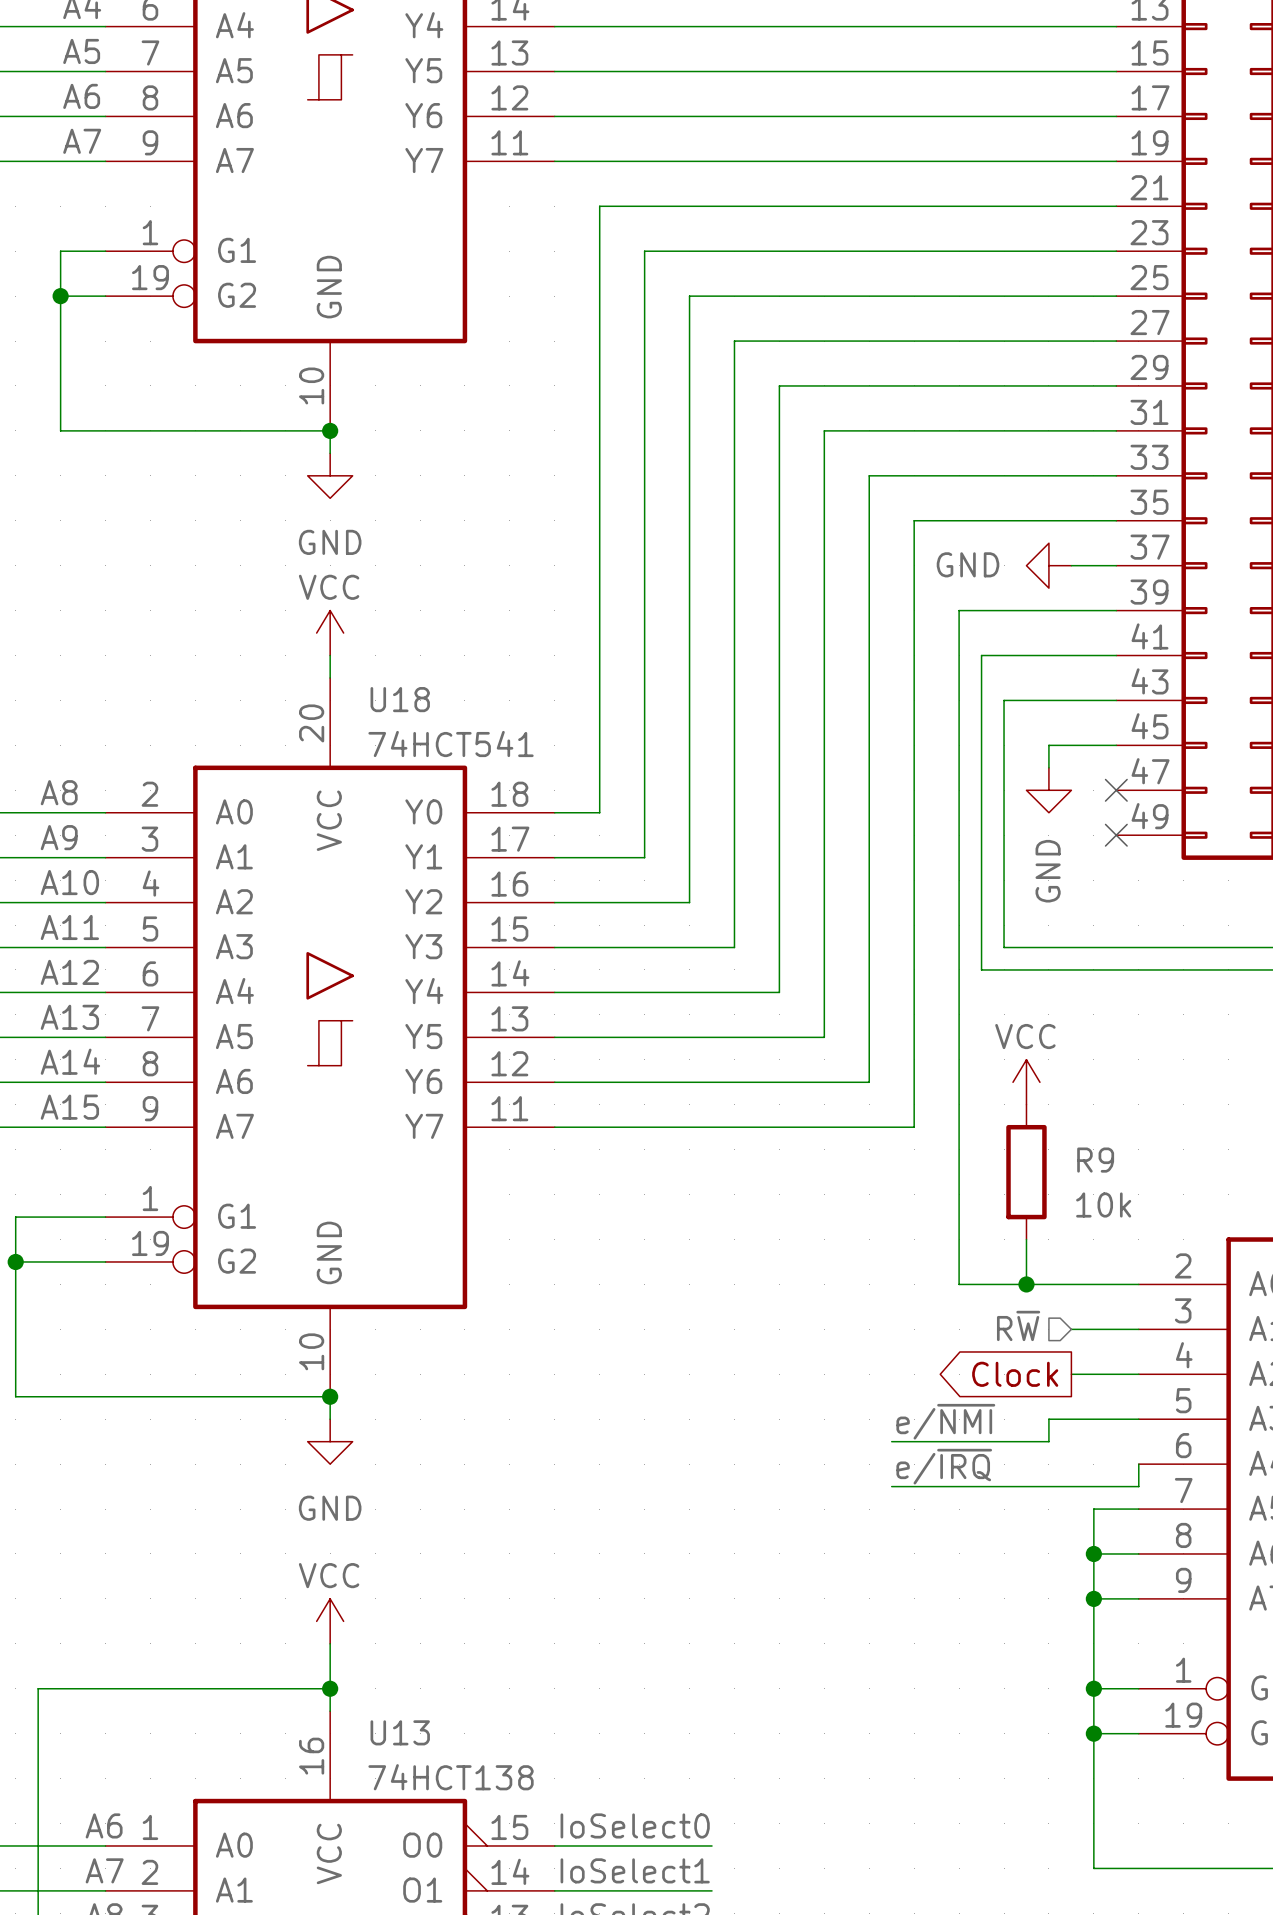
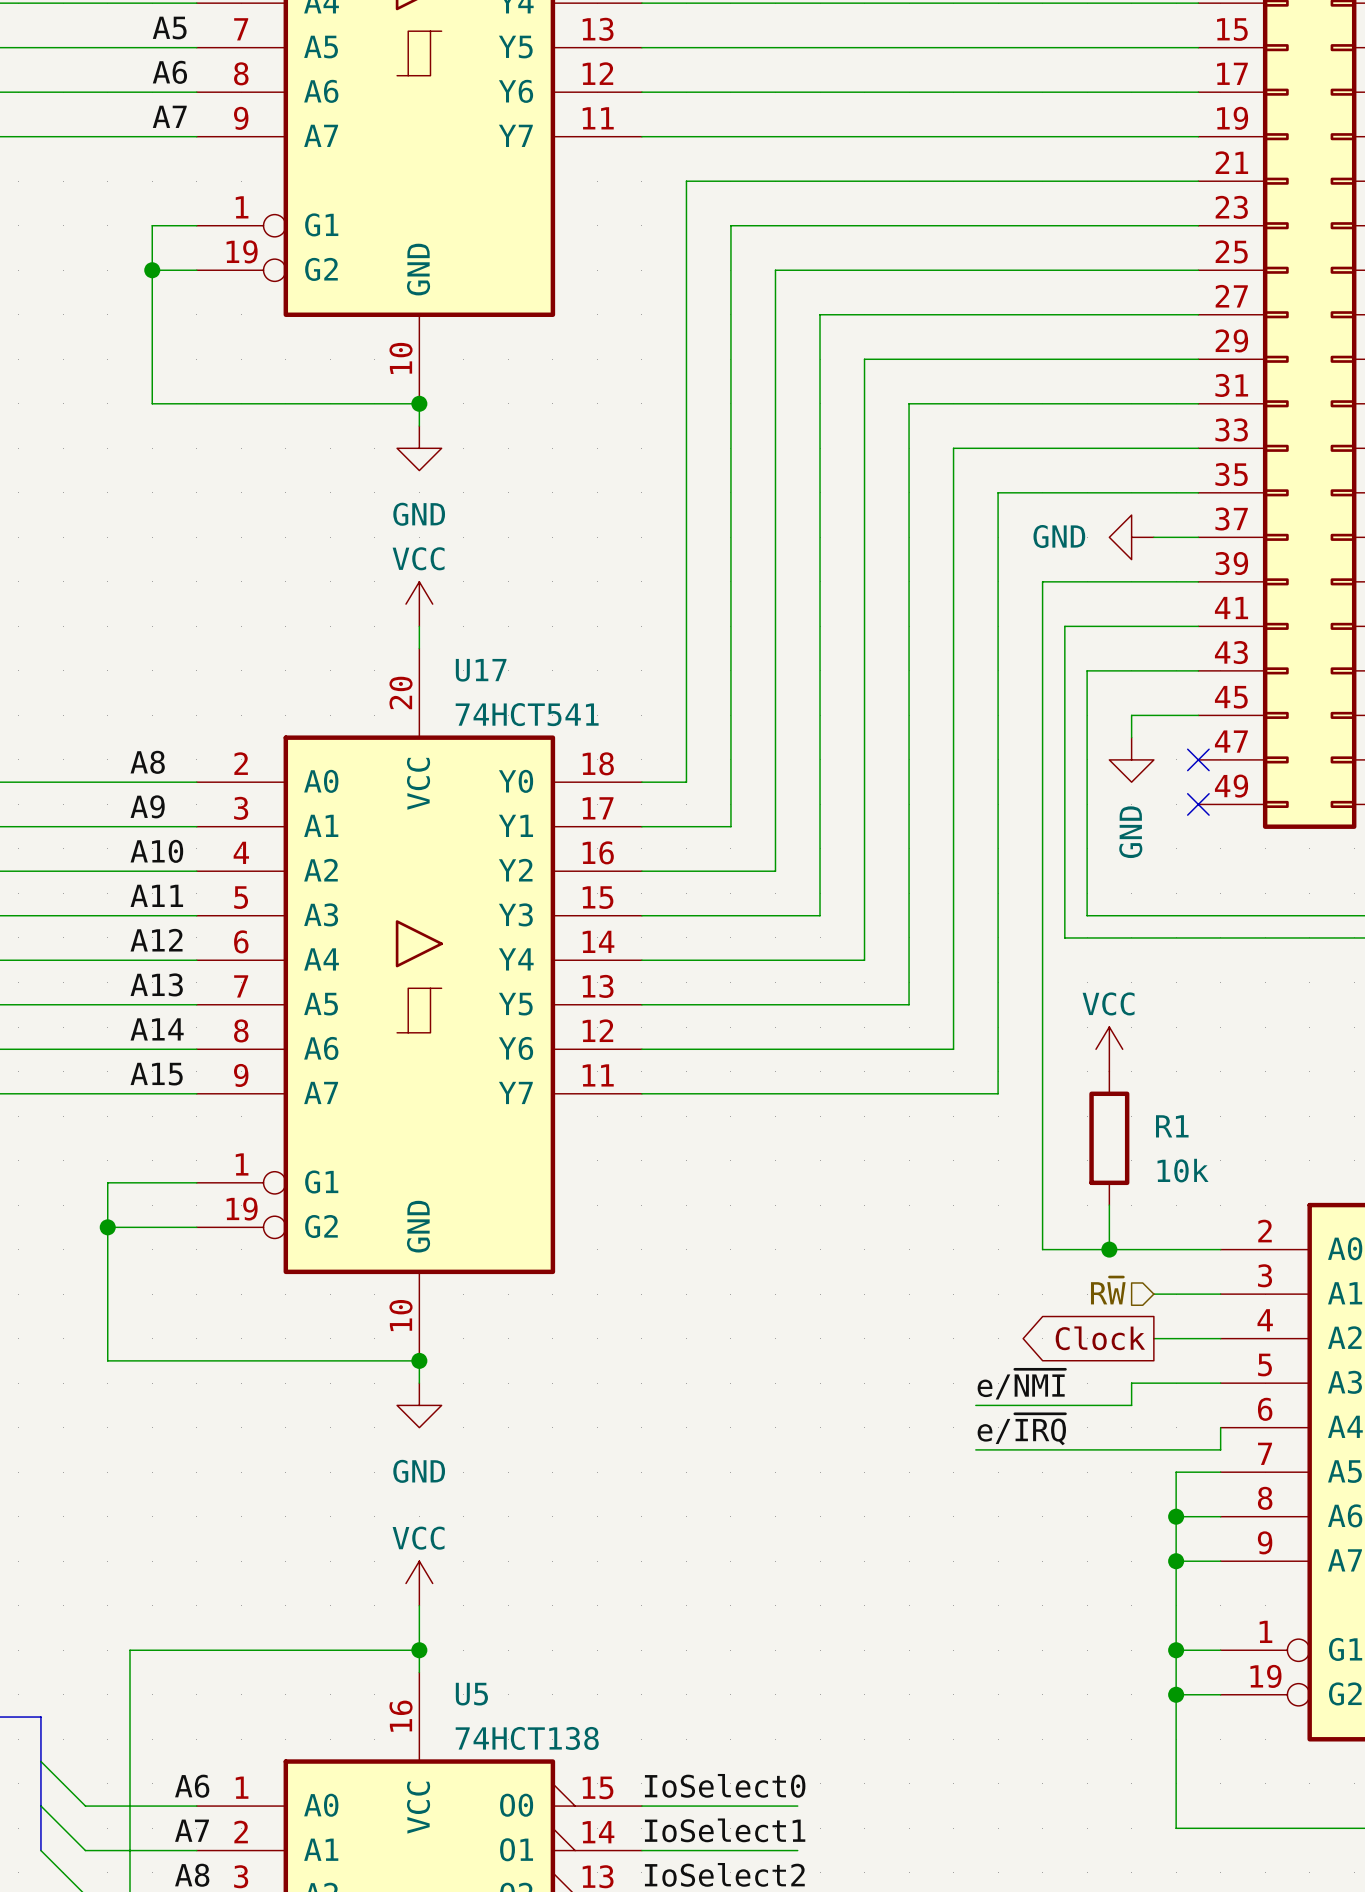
U18 name: U18 (400, 699) -> U17 (481, 670)
R9 name: R9 (1095, 1160) -> R1 (1172, 1126)
U13 name: U13 (400, 1732) -> U5 (471, 1694)

